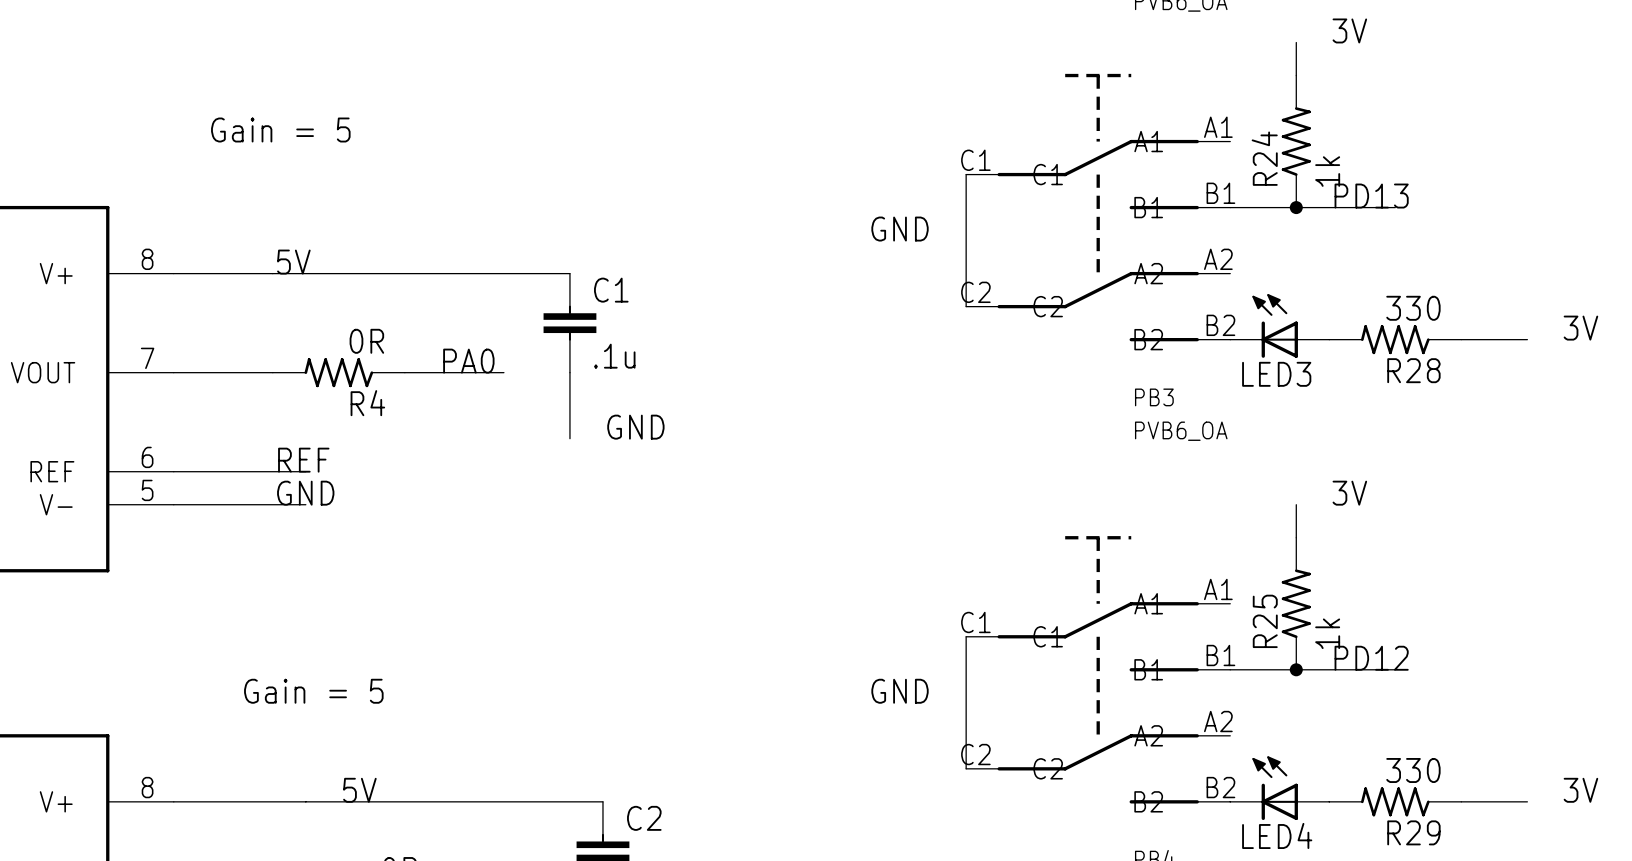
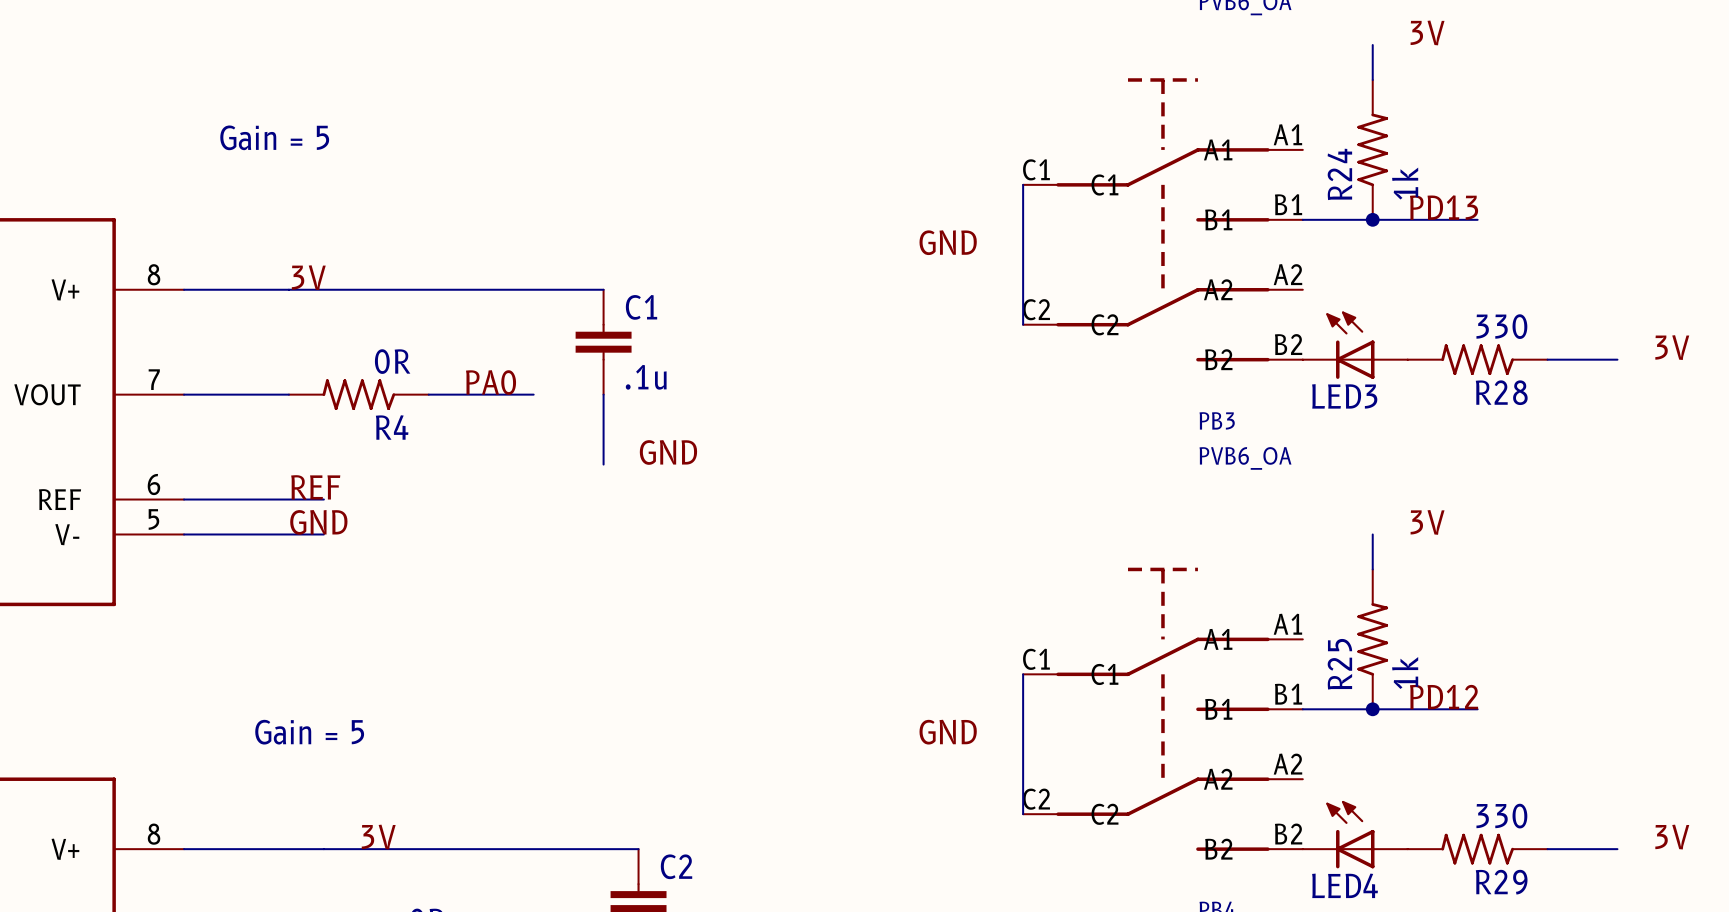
label: 5V (293, 262) -> 3V (308, 277)
label: 5V (359, 790) -> 3V (378, 837)

